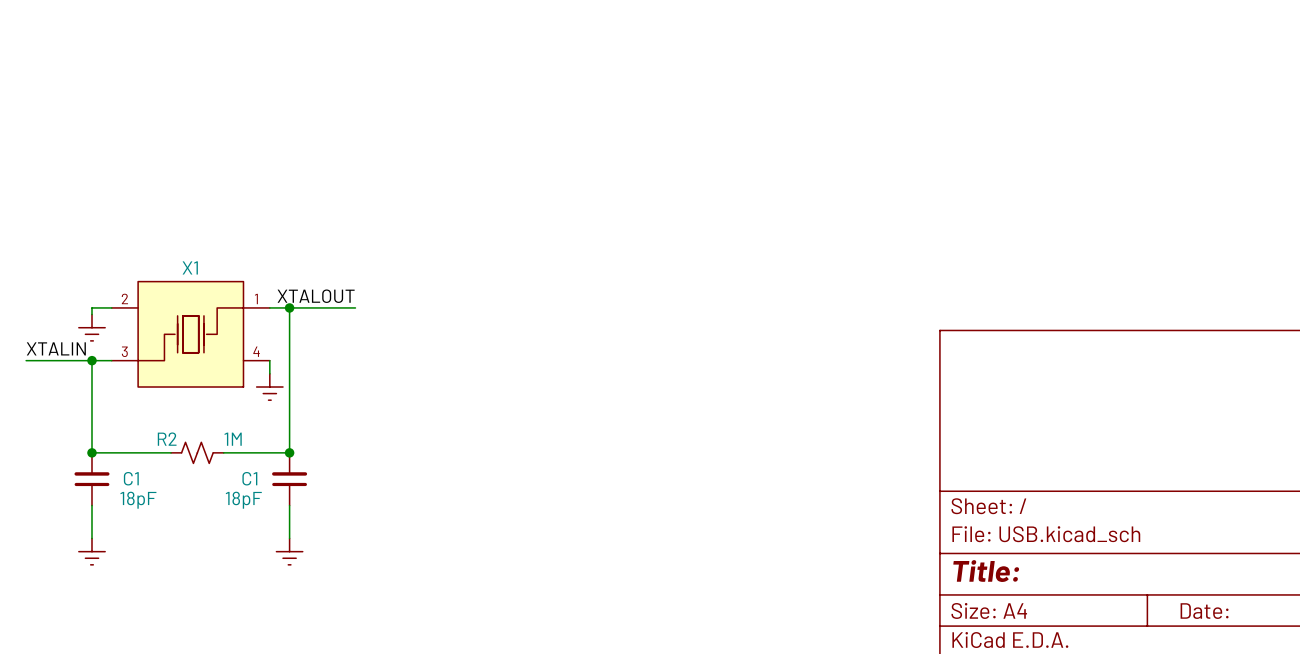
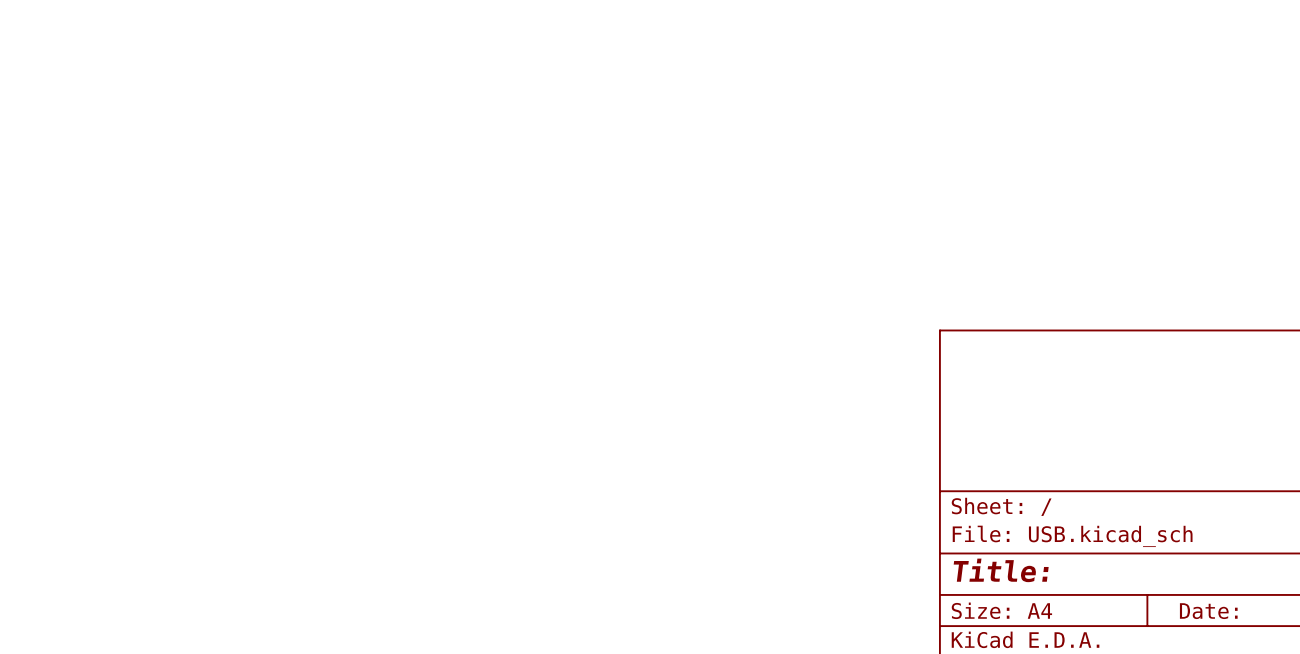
label: XTALOUT (316, 296) -> none
wire: (111, 307) (91, 307) (91, 314) -> none
wire: (269, 307) (355, 307) -> none
wire: (289, 307) (289, 452) (223, 452) -> none
junction: (289, 307) -> none
power symbol: (91, 327) -> none
X1: (190, 334) -> none
label: XTALIN (56, 348) -> none
wire: (26, 360) (111, 360) -> none
wire: (91, 360) (91, 452) (171, 452) -> none
junction: (91, 360) -> none
wire: (269, 360) (269, 373) -> none
power symbol: (269, 387) -> none
junction: (91, 452) -> none
R2: 1M (197, 452) -> none
junction: (289, 452) -> none
C1: 18pF (91, 479) -> none
C1: 18pF (289, 479) -> none
wire: (91, 505) (91, 538) -> none
wire: (289, 505) (289, 538) -> none
power symbol: (91, 551) -> none
power symbol: (289, 551) -> none

